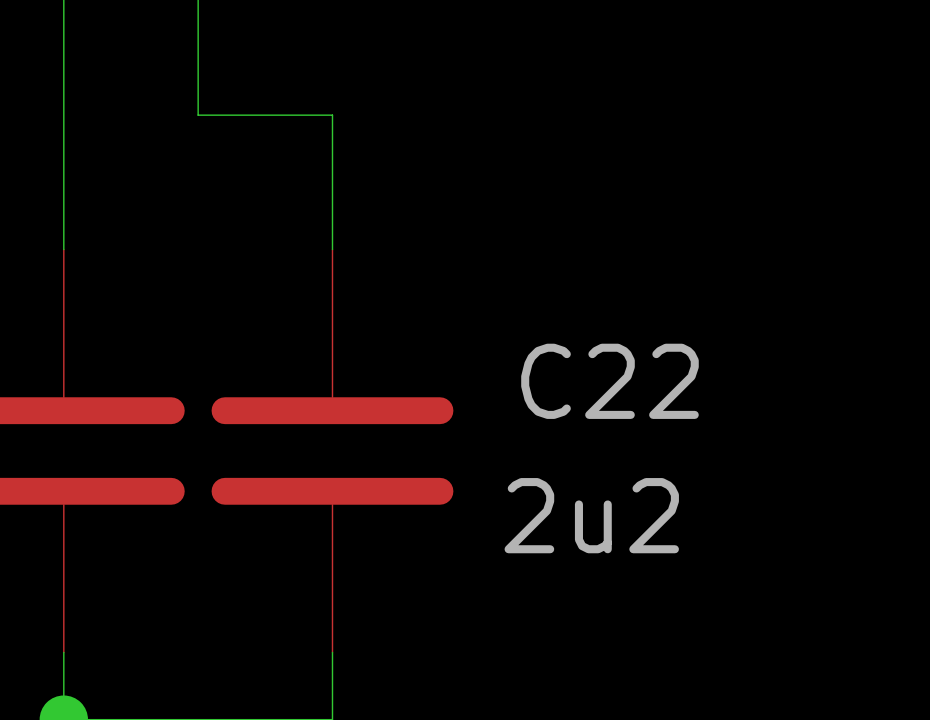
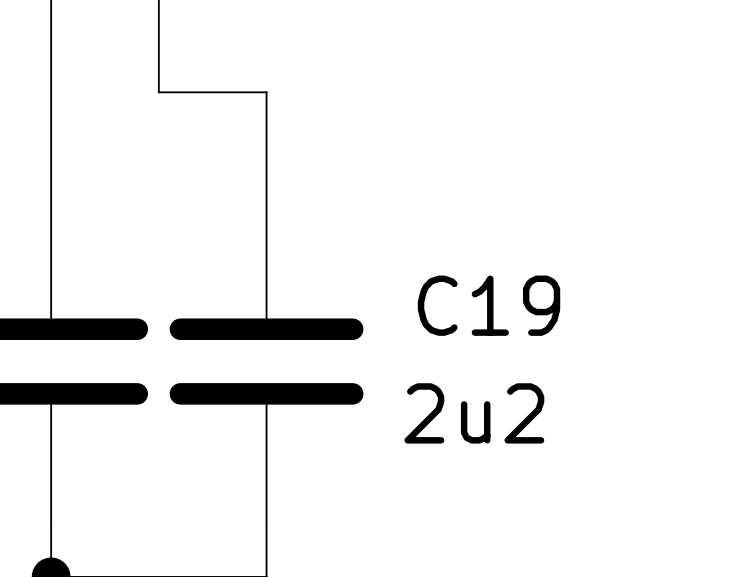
C22 name: C22 (609, 381) -> C19 (489, 305)

